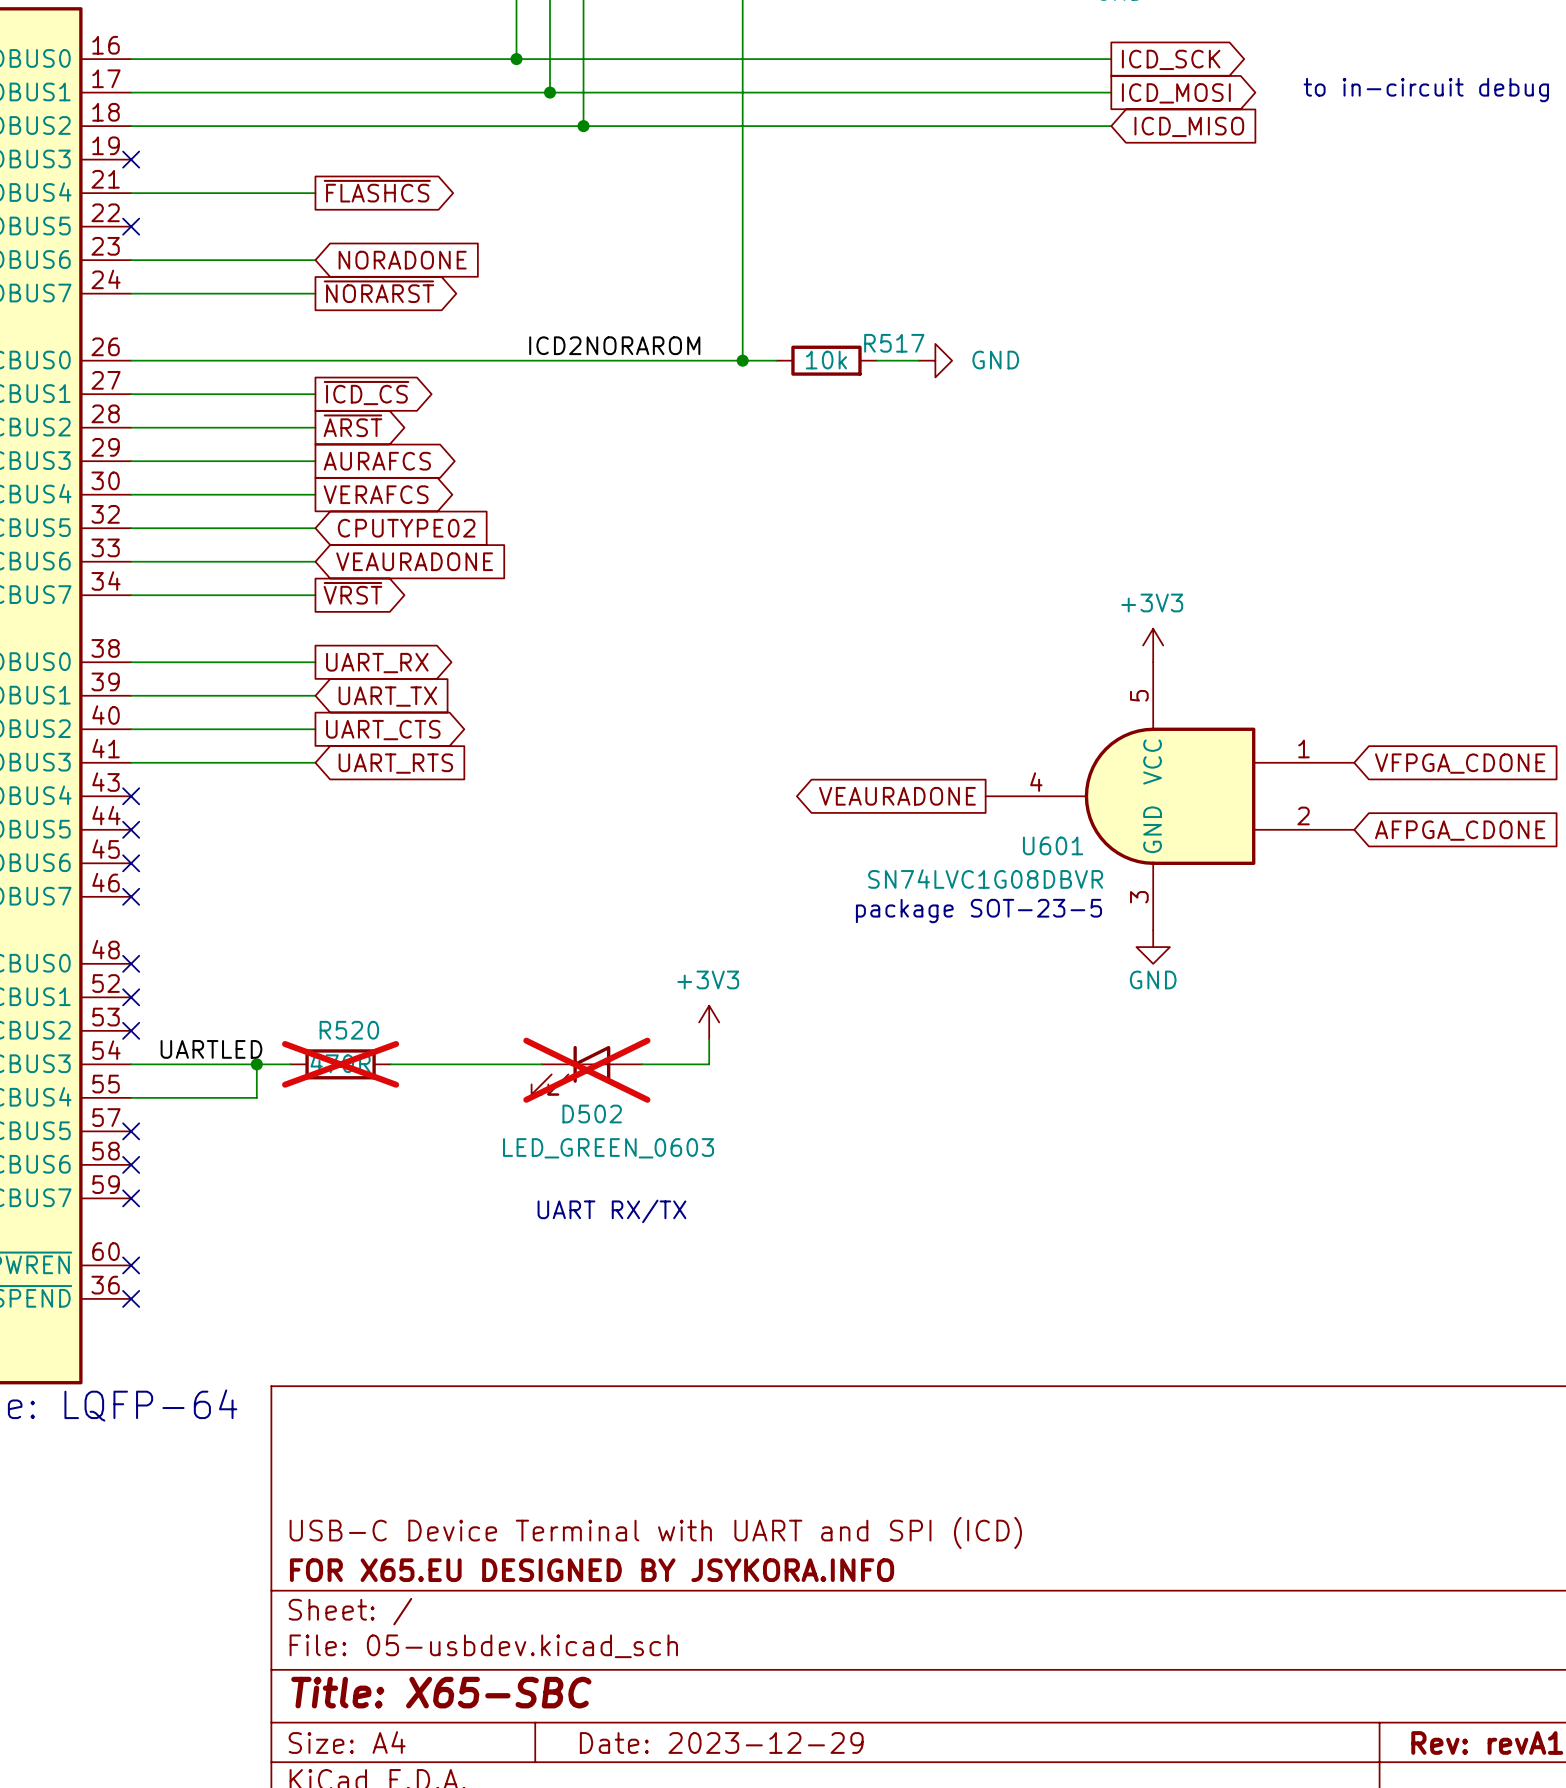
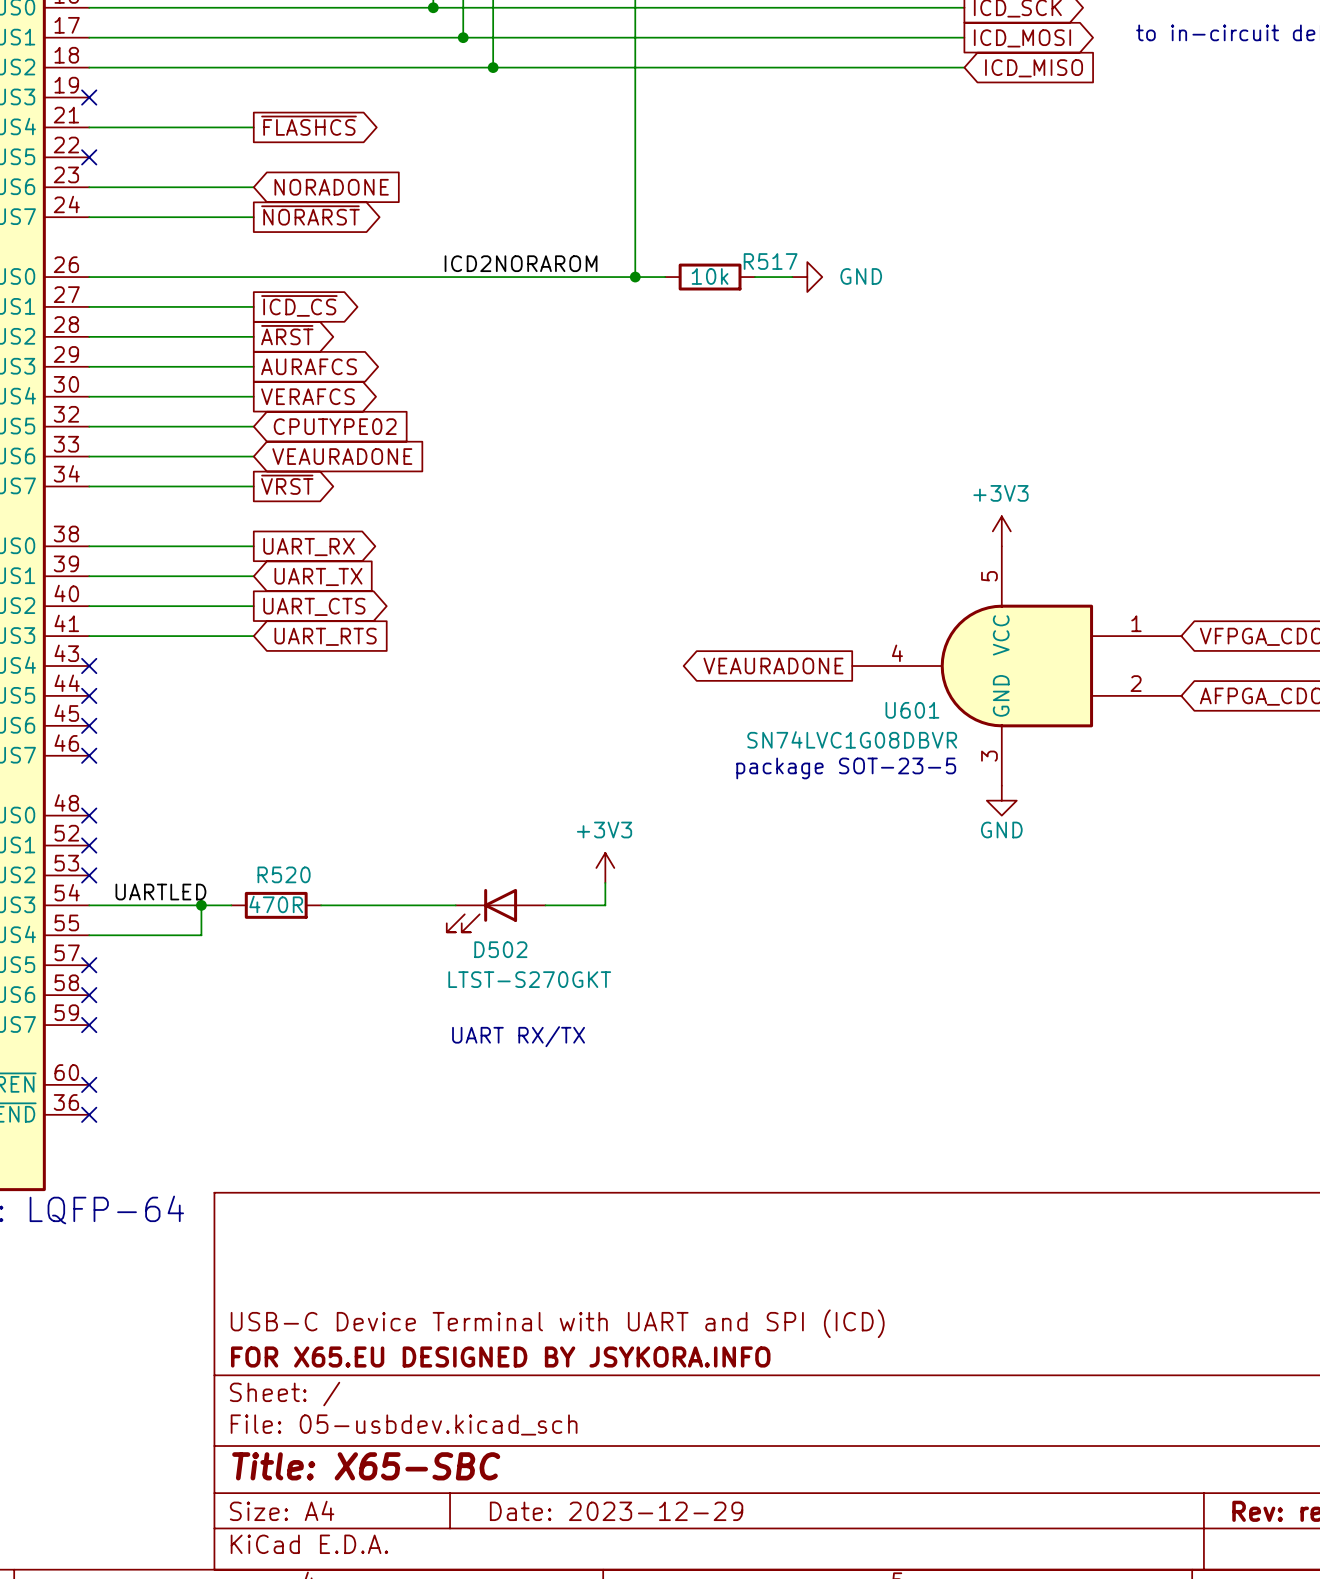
R520 do-not-place cross: (340, 1064) -> none
D502 do-not-place cross: (586, 1070) -> none
D502 value: LED_GREEN_0603 (608, 1148) -> LTST-S270GKT (529, 979)

